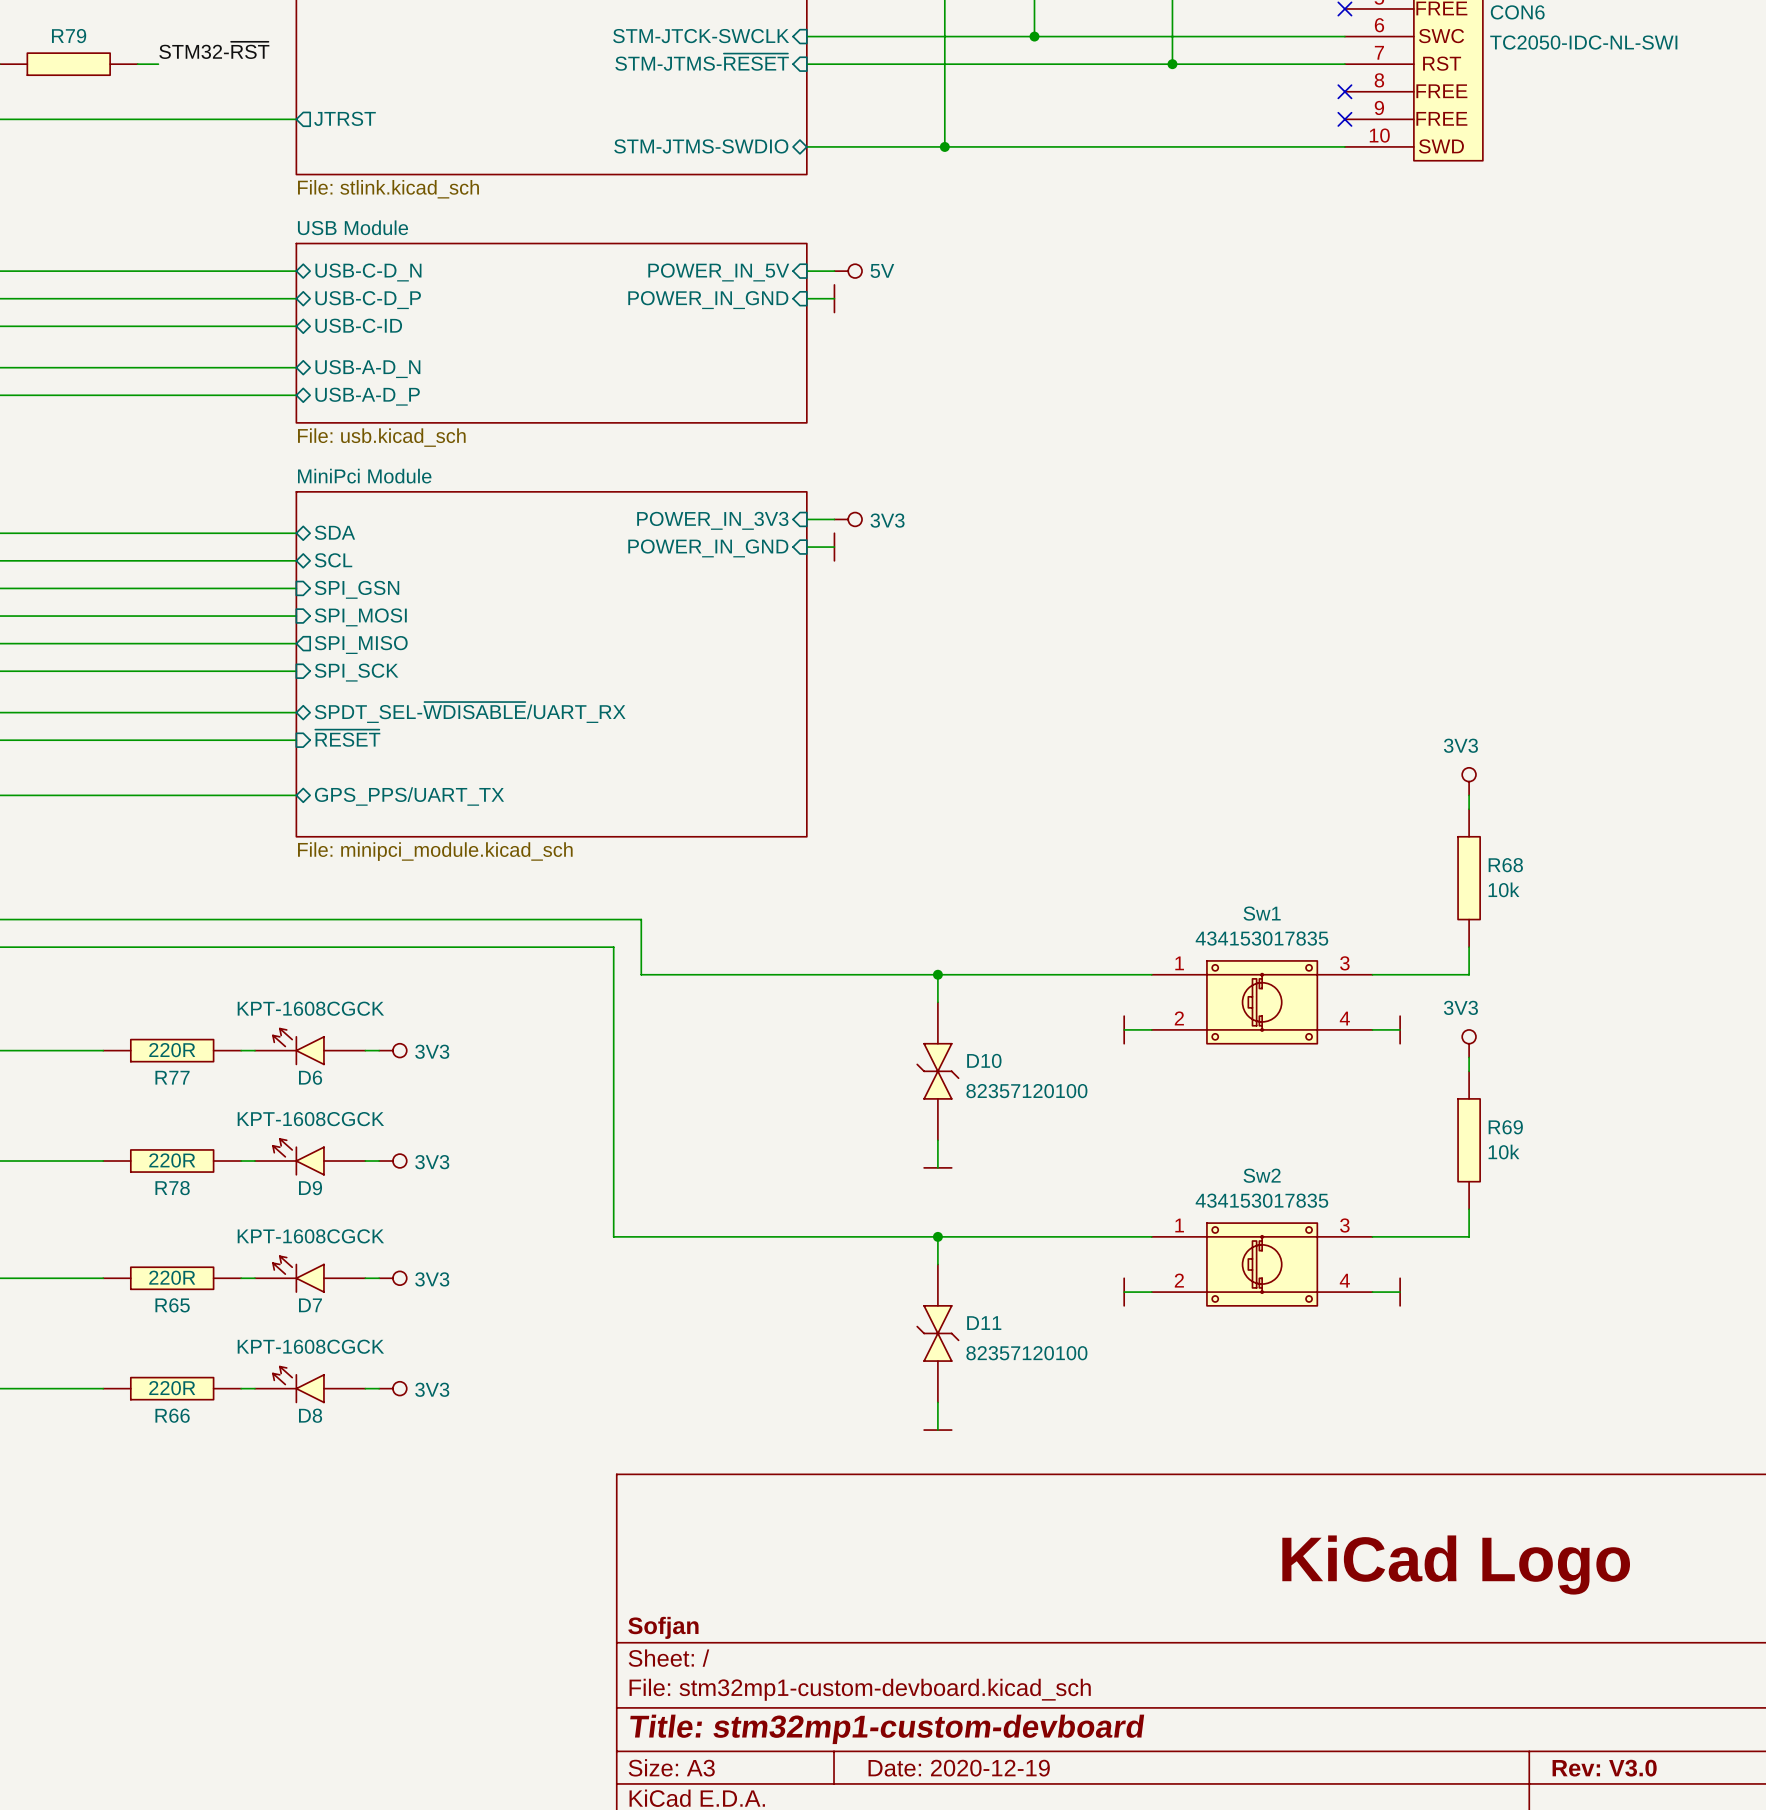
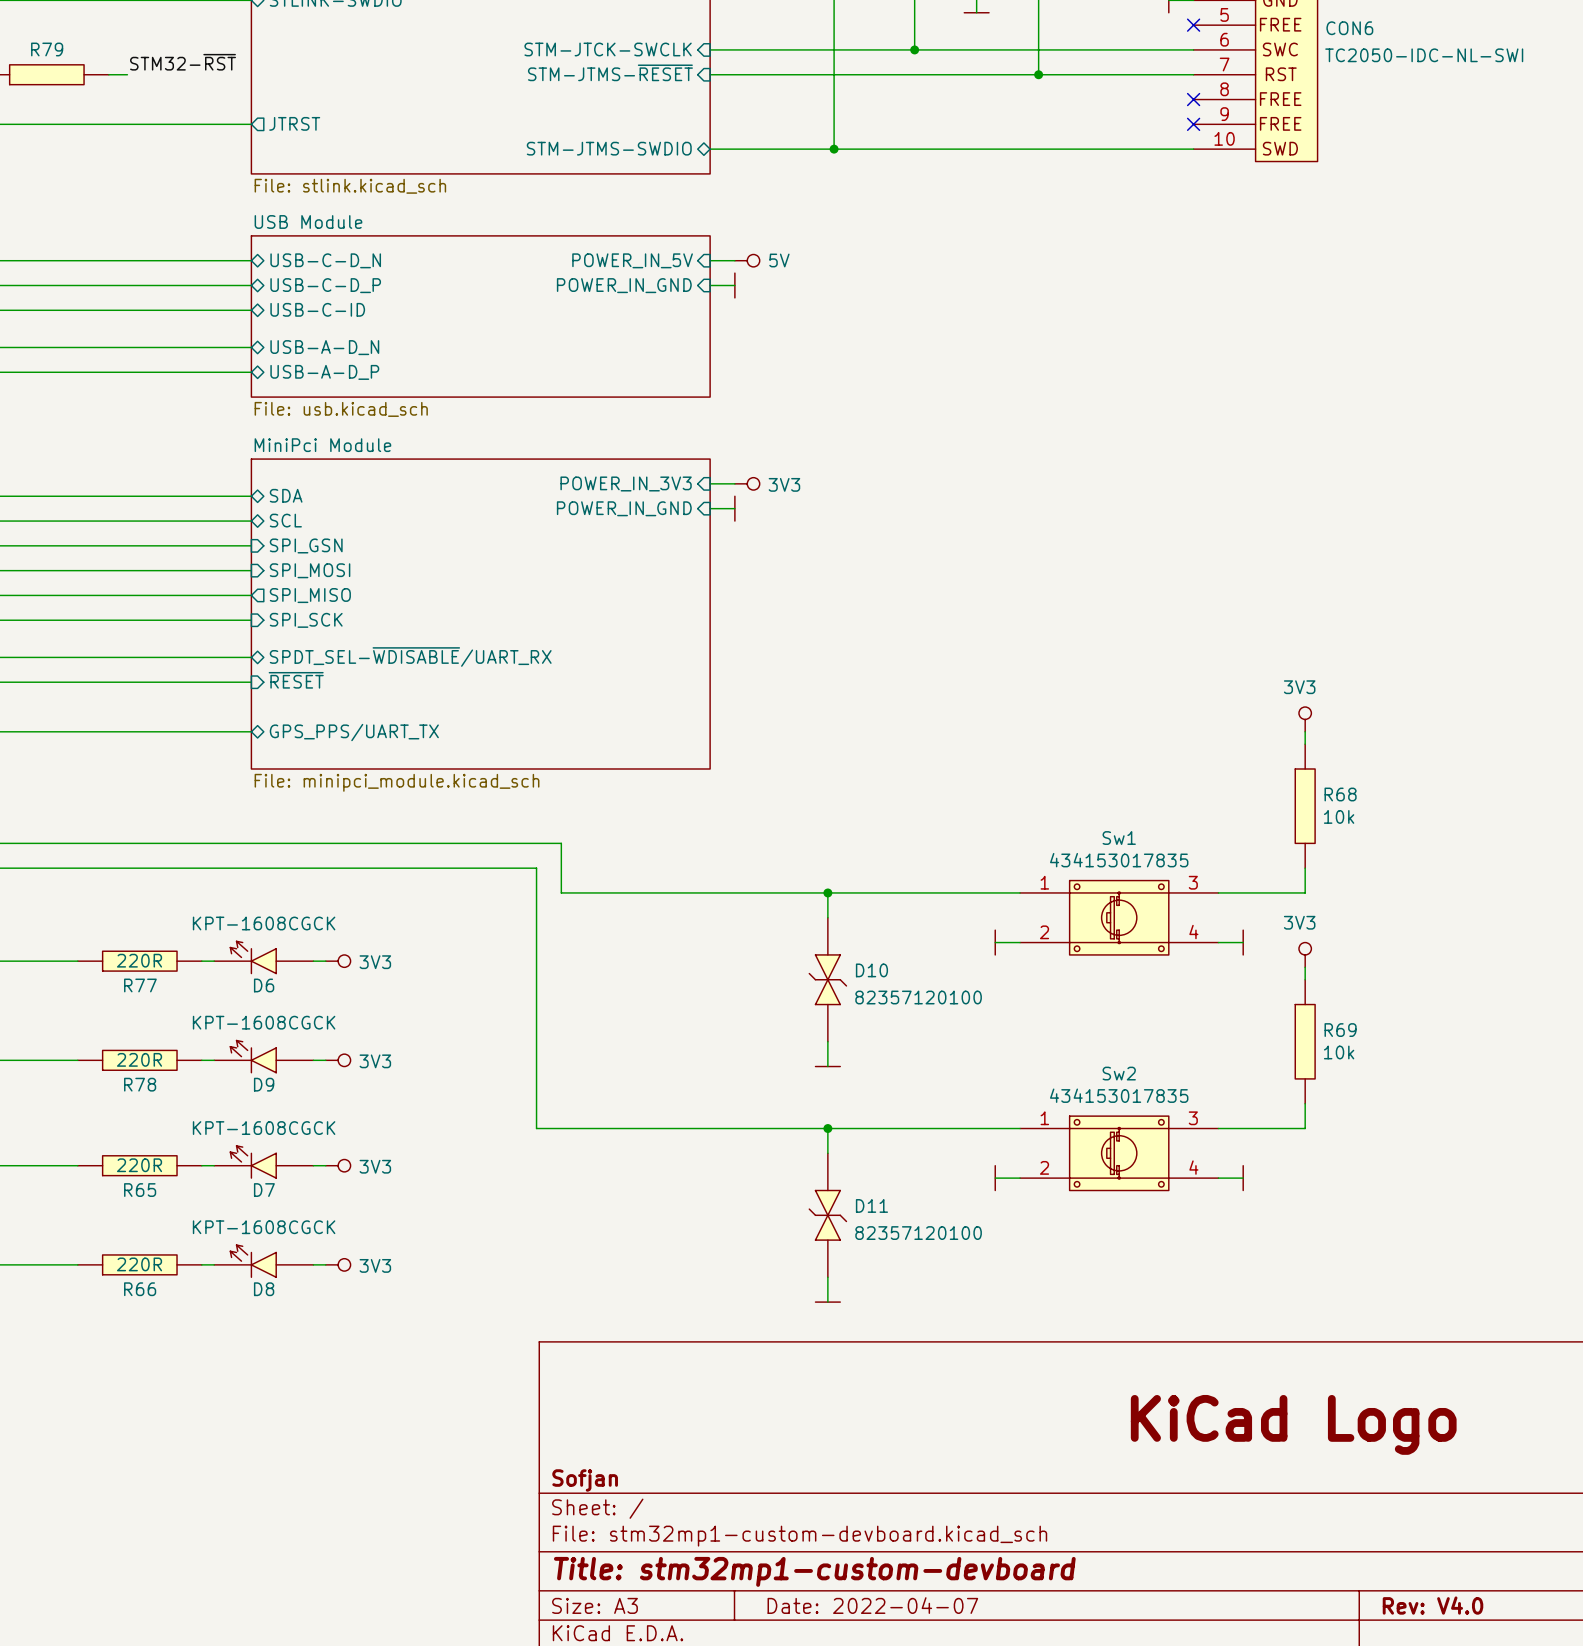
title block: Date: 2020-12-19 (959, 1768) -> Date: 2022-04-07 (872, 1605)
title block: Rev: V3.0 (1604, 1768) -> Rev: V4.0 (1433, 1605)

